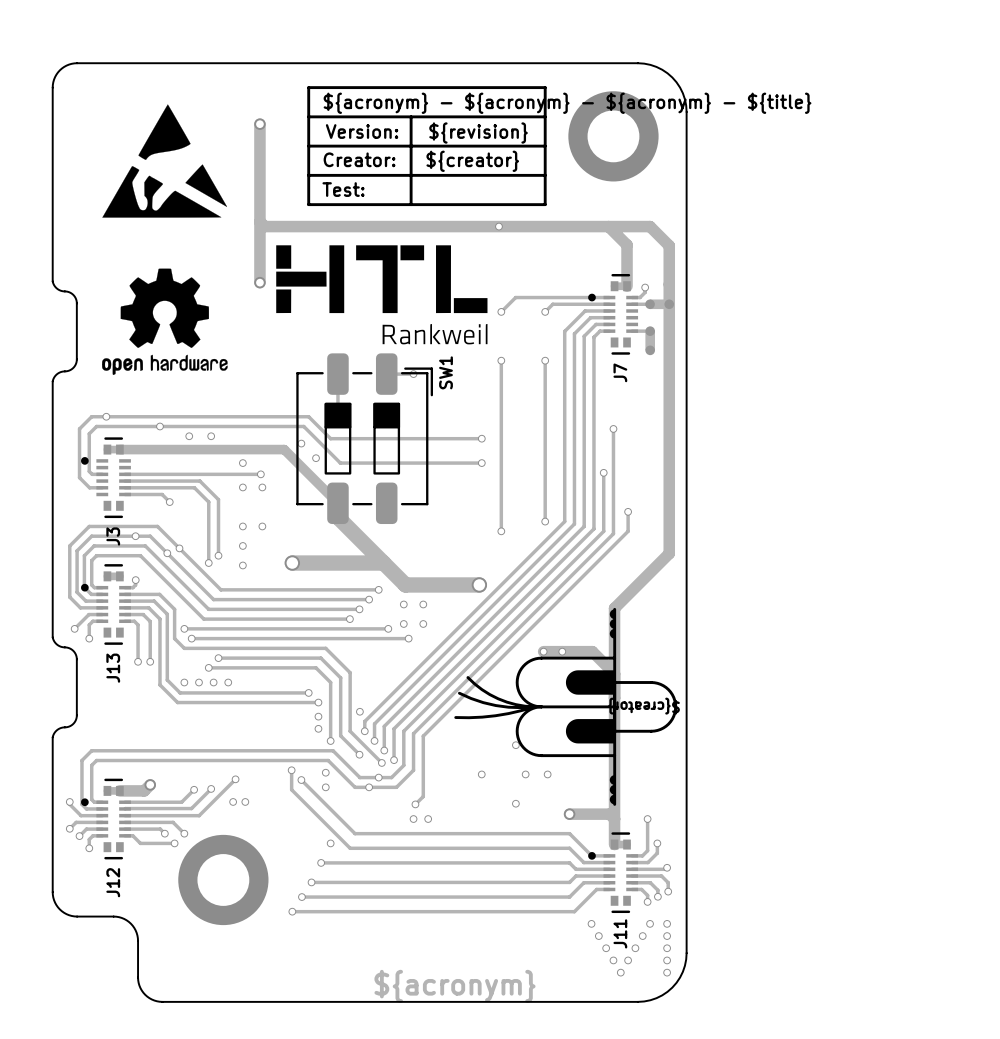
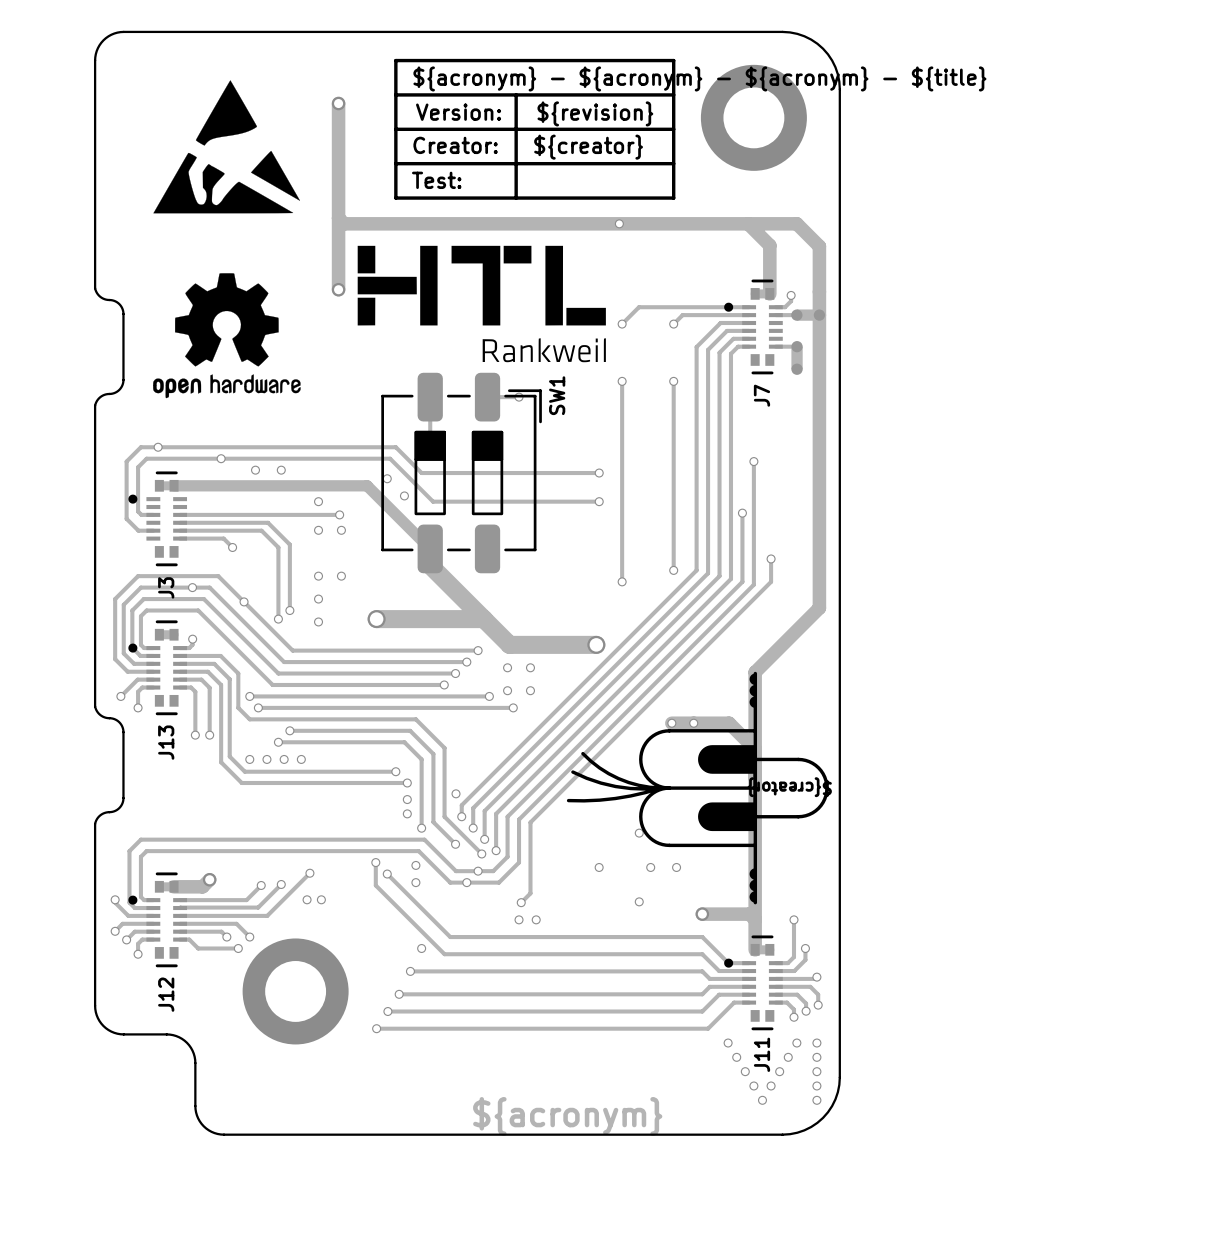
via: (167, 553) -> none

